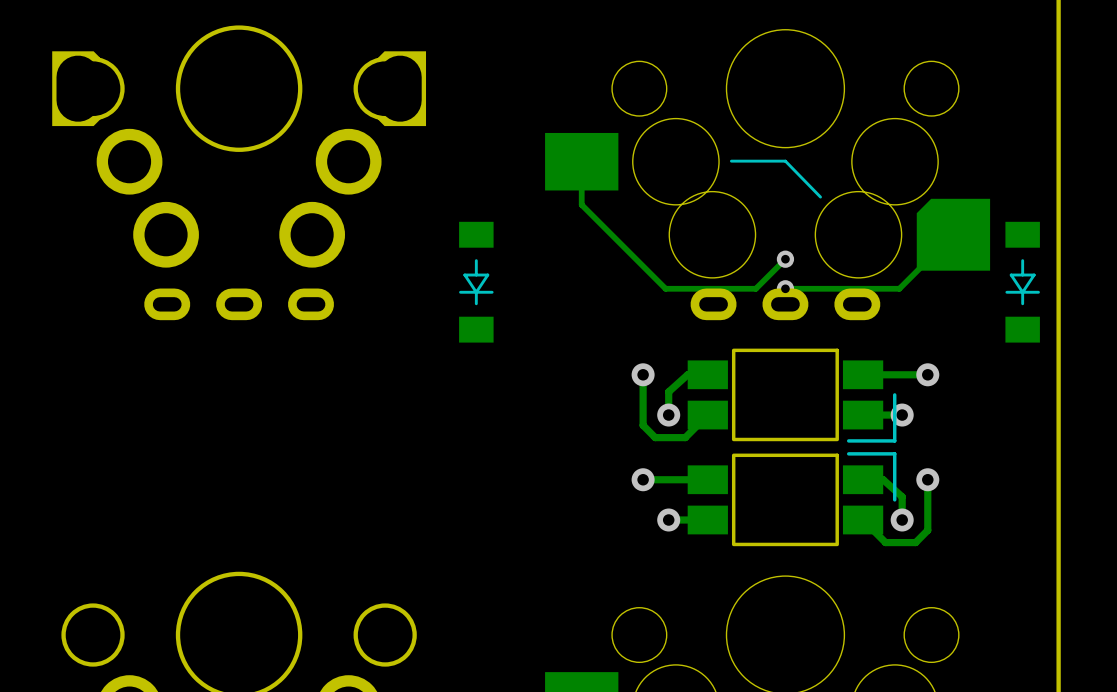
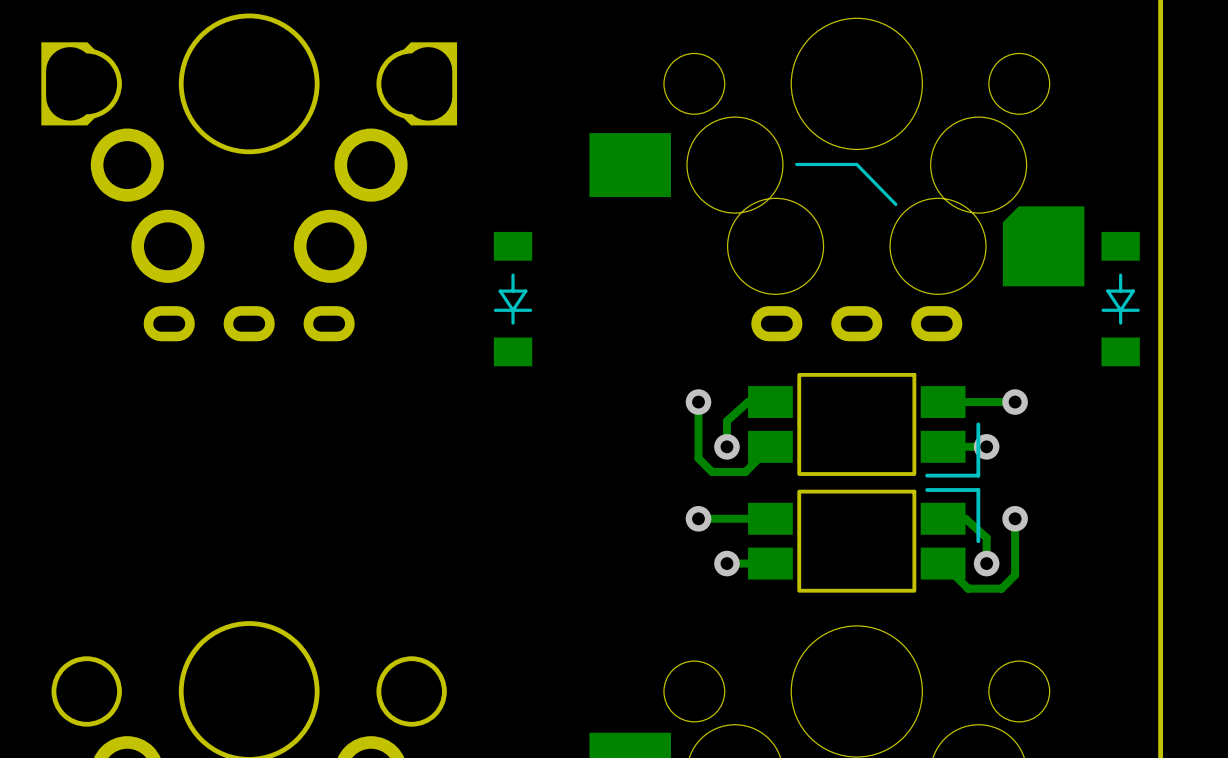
track: (581, 161) (581, 204) (665, 288) (755, 288) (785, 259) -> none
track: (953, 234) (899, 288) (785, 288) -> none
via: (785, 259) -> none
via: (785, 288) -> none

